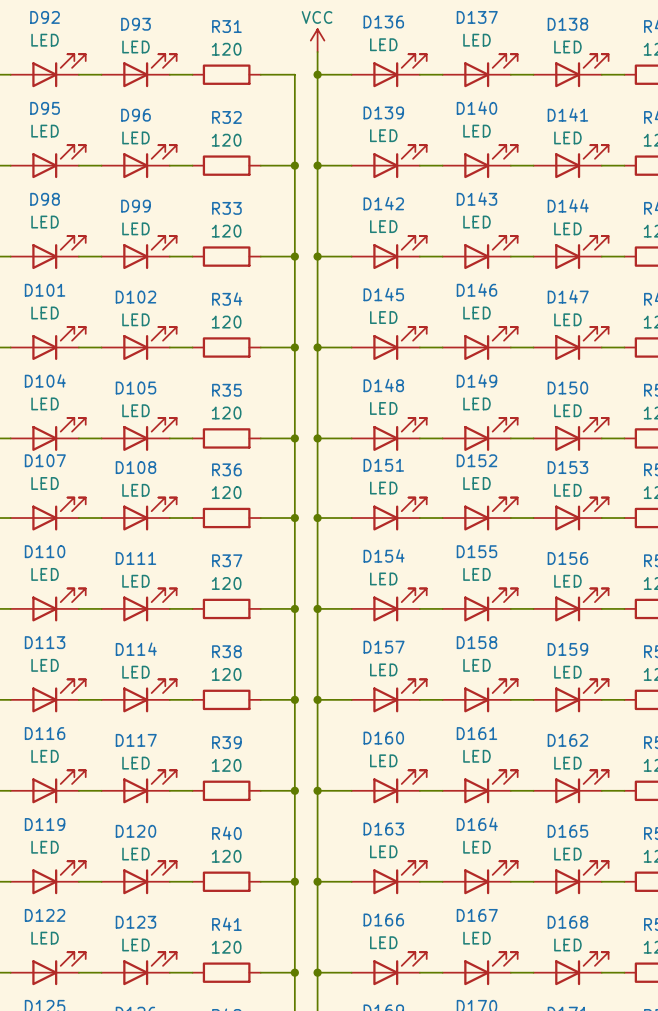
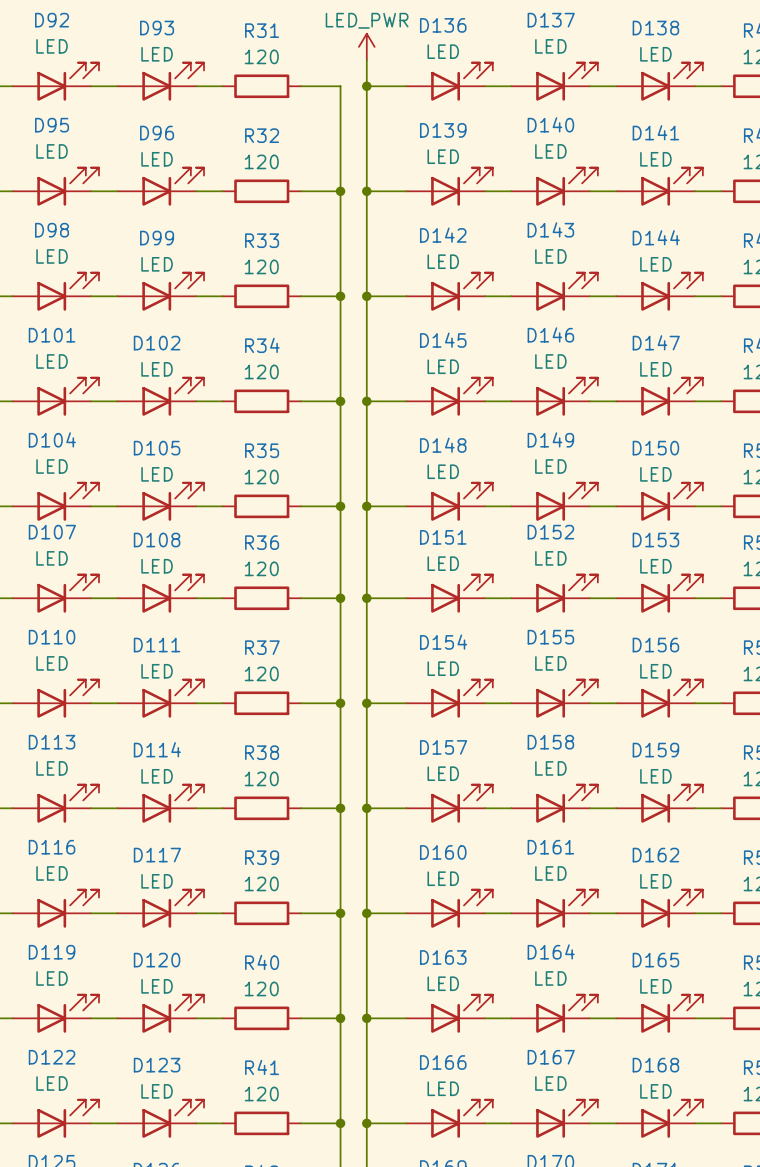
power symbol: VCC (317, 40) -> LED_PWR (366, 46)

